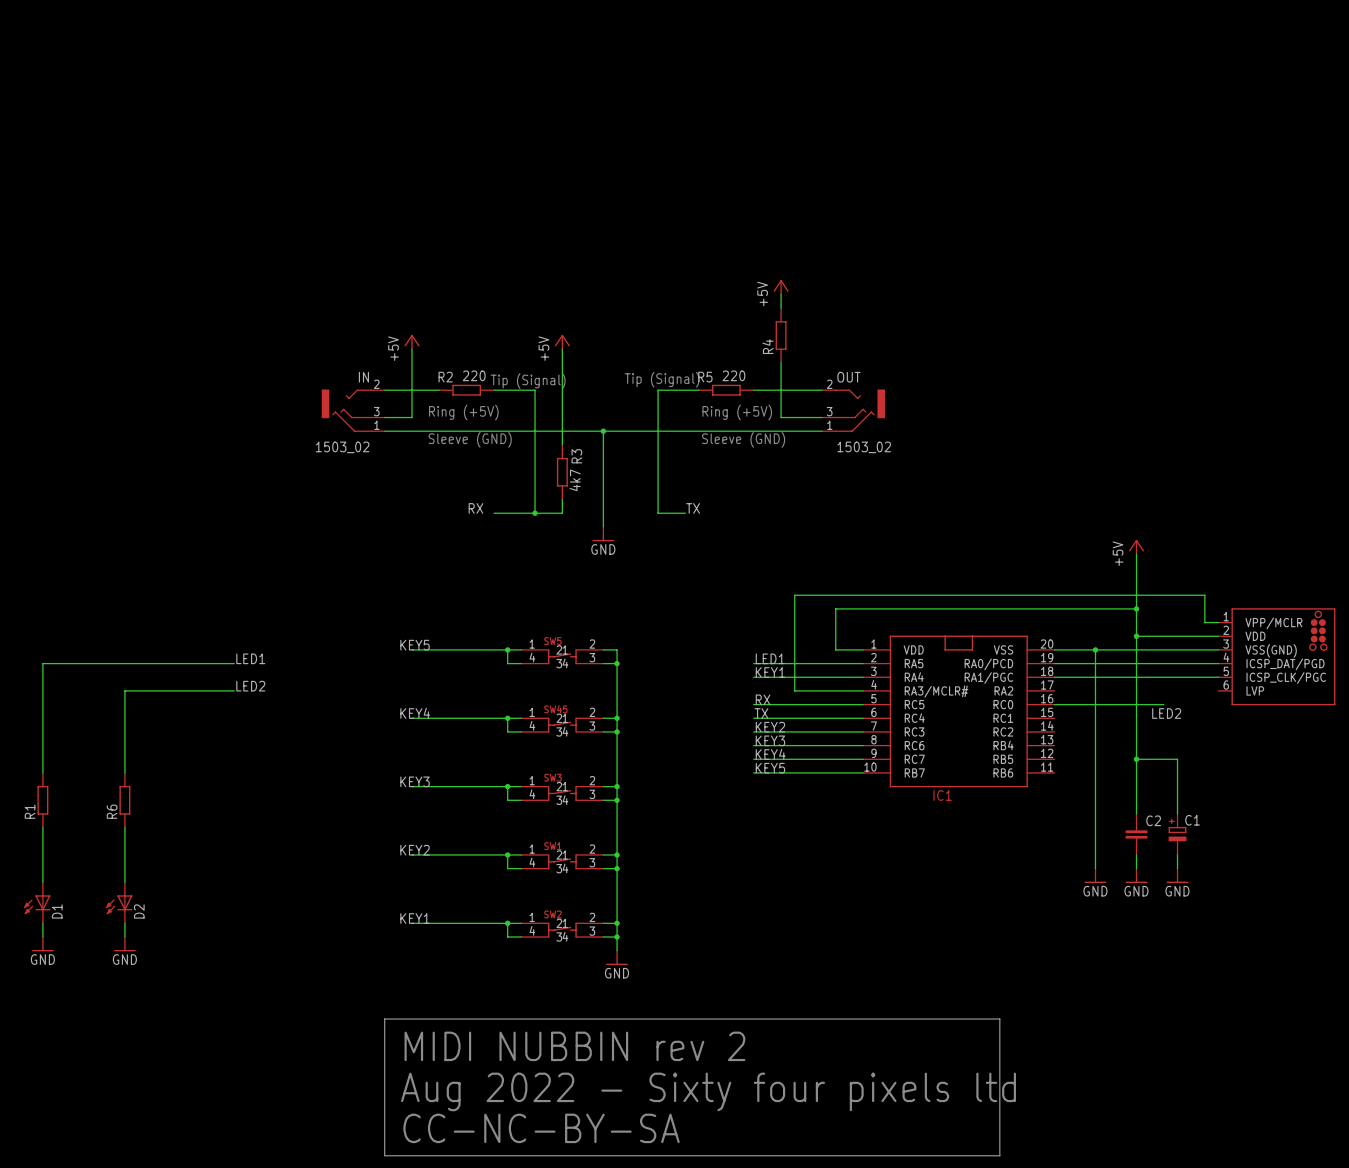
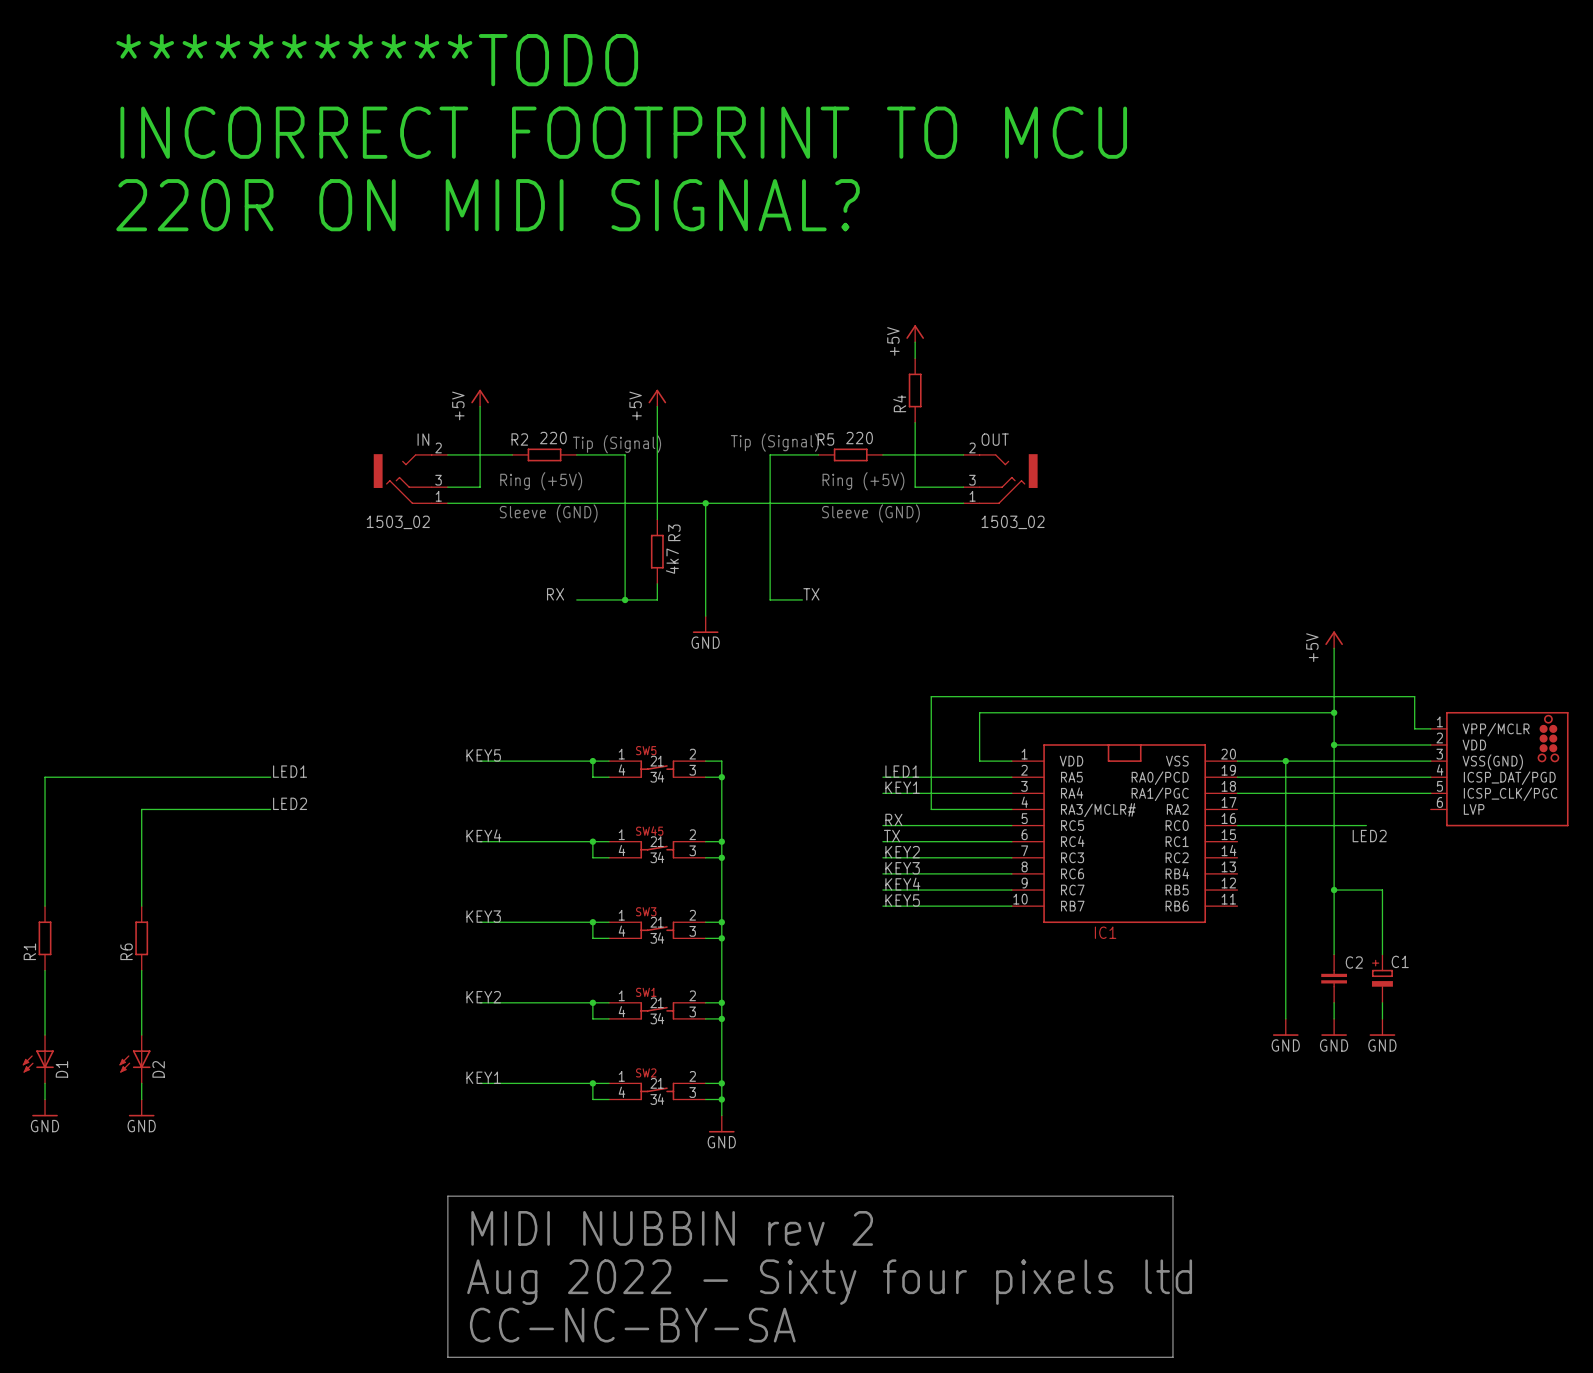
text: none -> ***********TODO (377, 60)
text: none -> INCORRECT FOOTPRINT TO MCU (623, 132)
text: none -> 220R ON MIDI SIGNAL? (488, 205)

